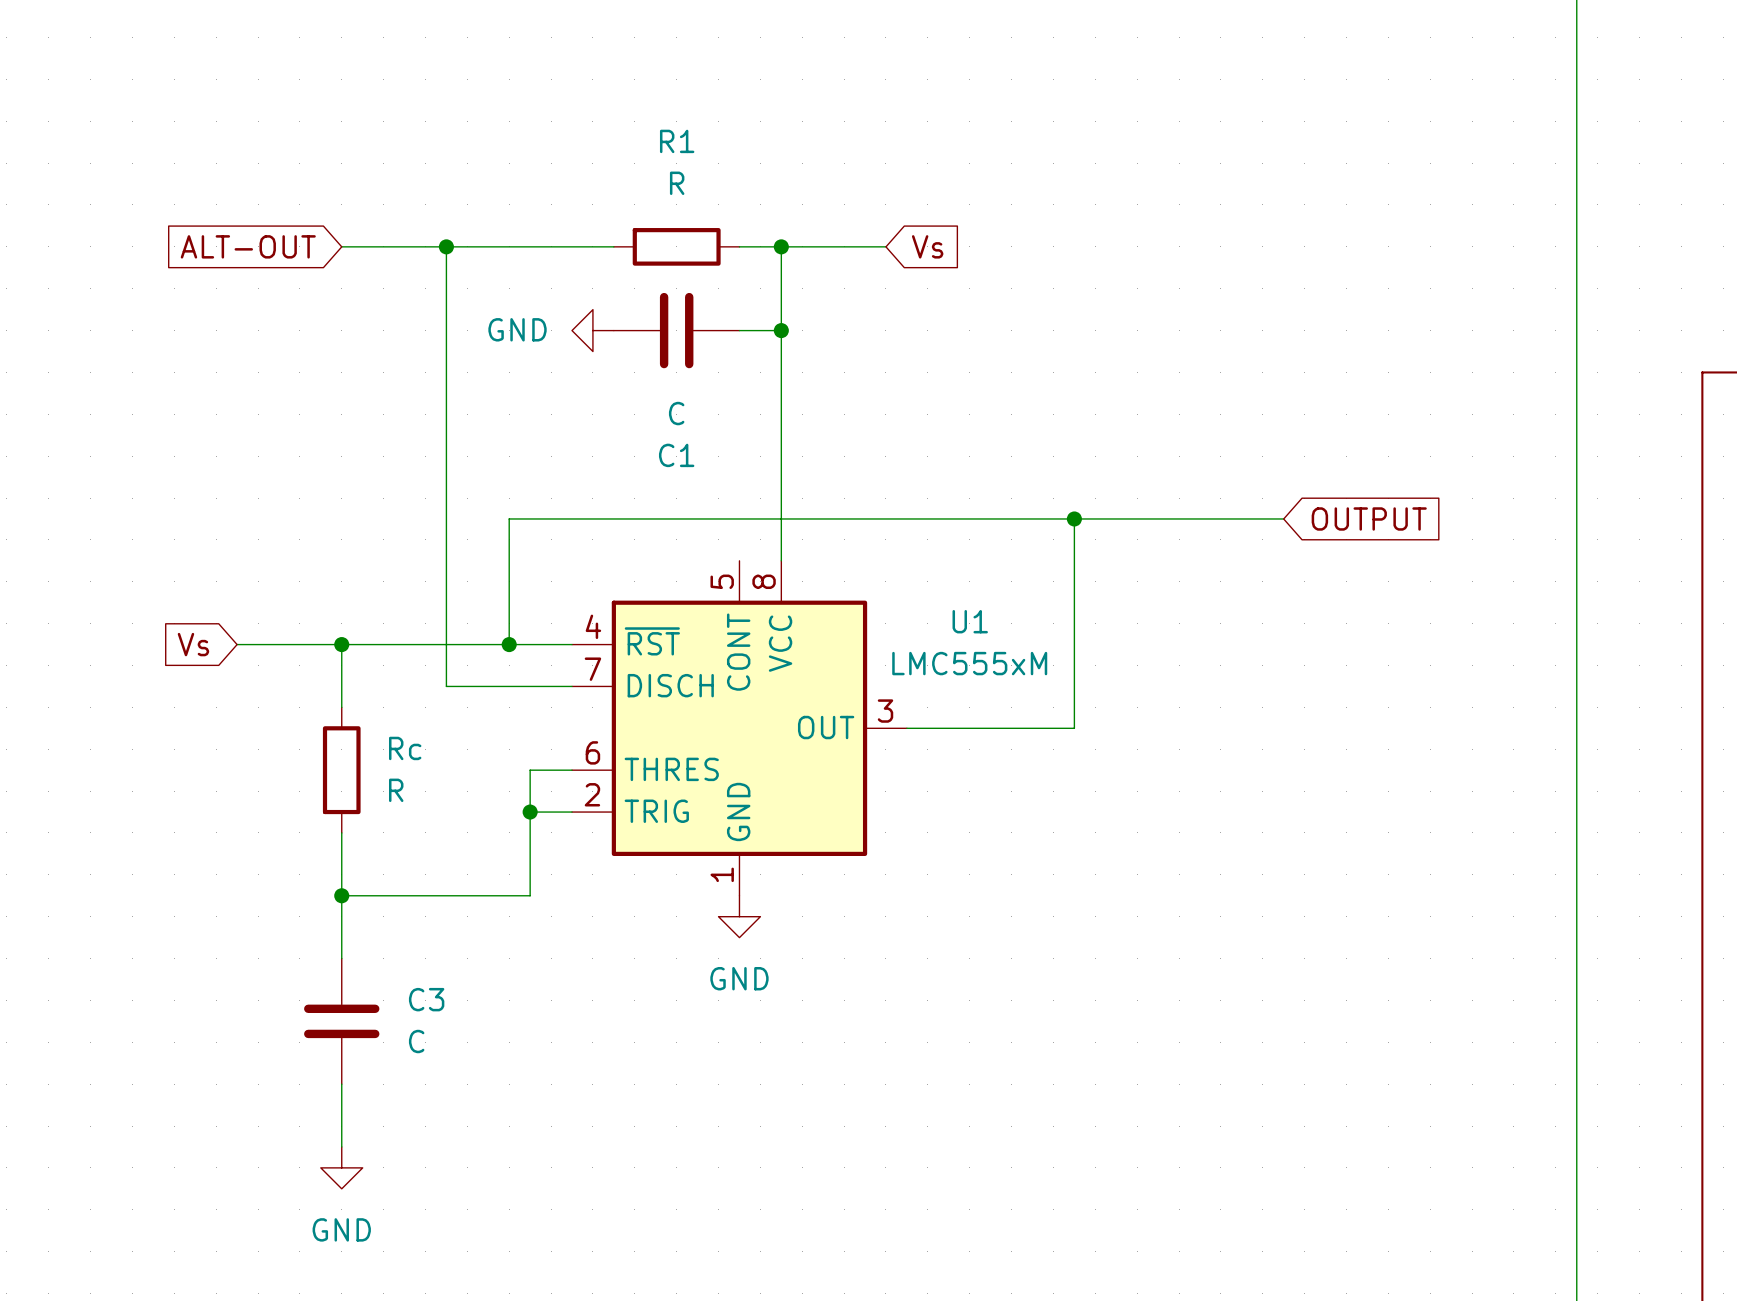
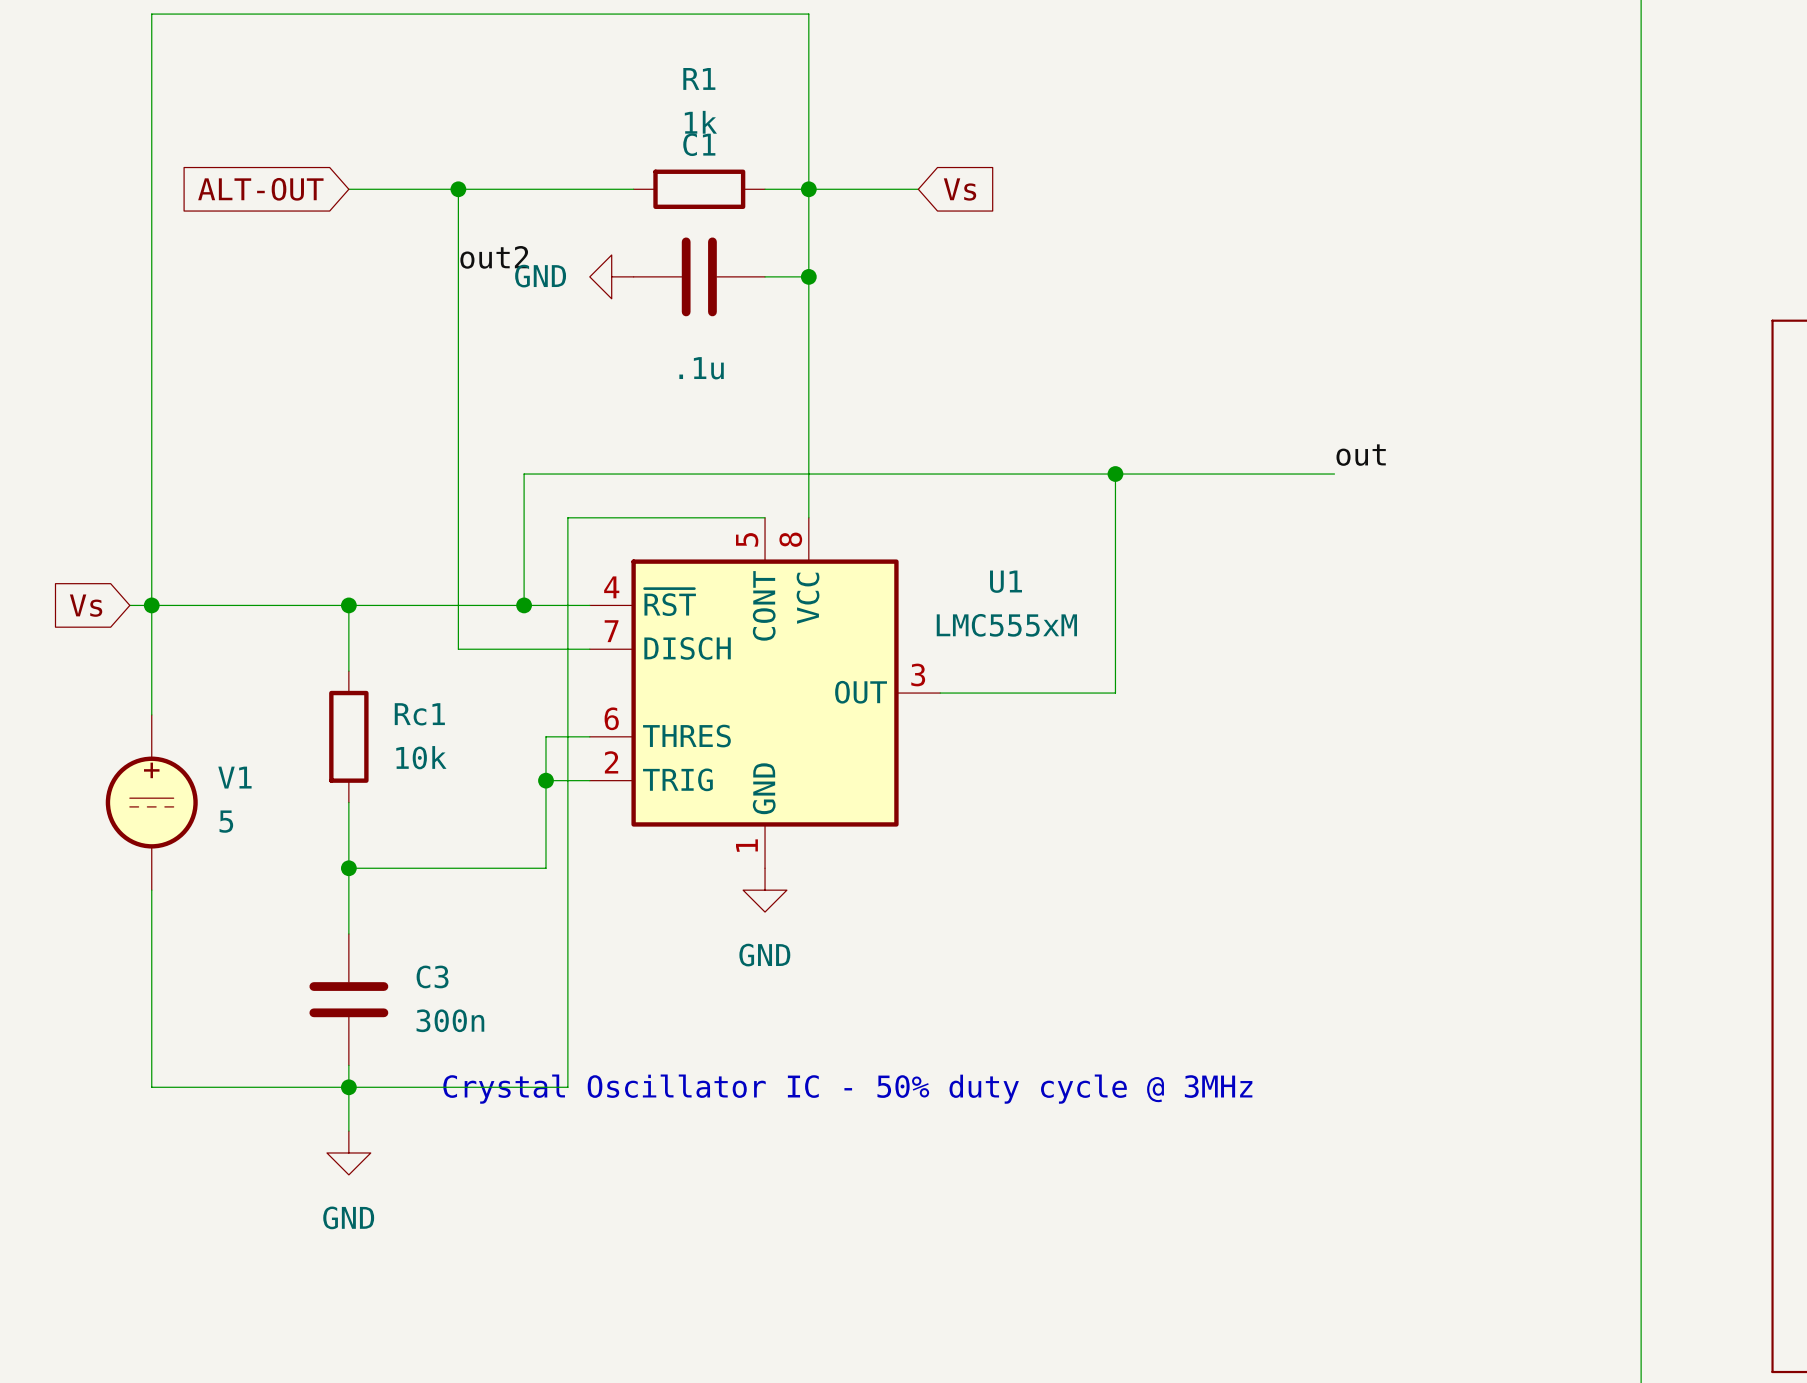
R1 value: R (677, 183) -> 1k (700, 122)
wire: none -> (808, 189) (808, 14) (151, 14) (151, 714)
label: none -> out2 (494, 257)
C1 value: C (676, 413) -> .1u (701, 368)
C1 name position: C1 (676, 455) -> C1 (699, 144)
label: none -> out (1361, 455)
global label: OUTPUT (1369, 518) -> none
wire: none -> (765, 517) (567, 517) (567, 1087) (151, 1087) (151, 890)
wire: none -> (129, 605) (239, 605)
junction: none -> (151, 605)
global label position: Vs (193, 644) -> Vs (86, 605)
Rc name: Rc (405, 748) -> Rc1 (419, 714)
Rc value: R (396, 790) -> 10k (421, 757)
V1: none -> 5 (151, 802)
C3 value: C (416, 1041) -> 300n (450, 1020)
junction: none -> (348, 1087)
text: none -> Crystal Oscillator IC - 50% duty cycle @ 3MHz (847, 1089)

